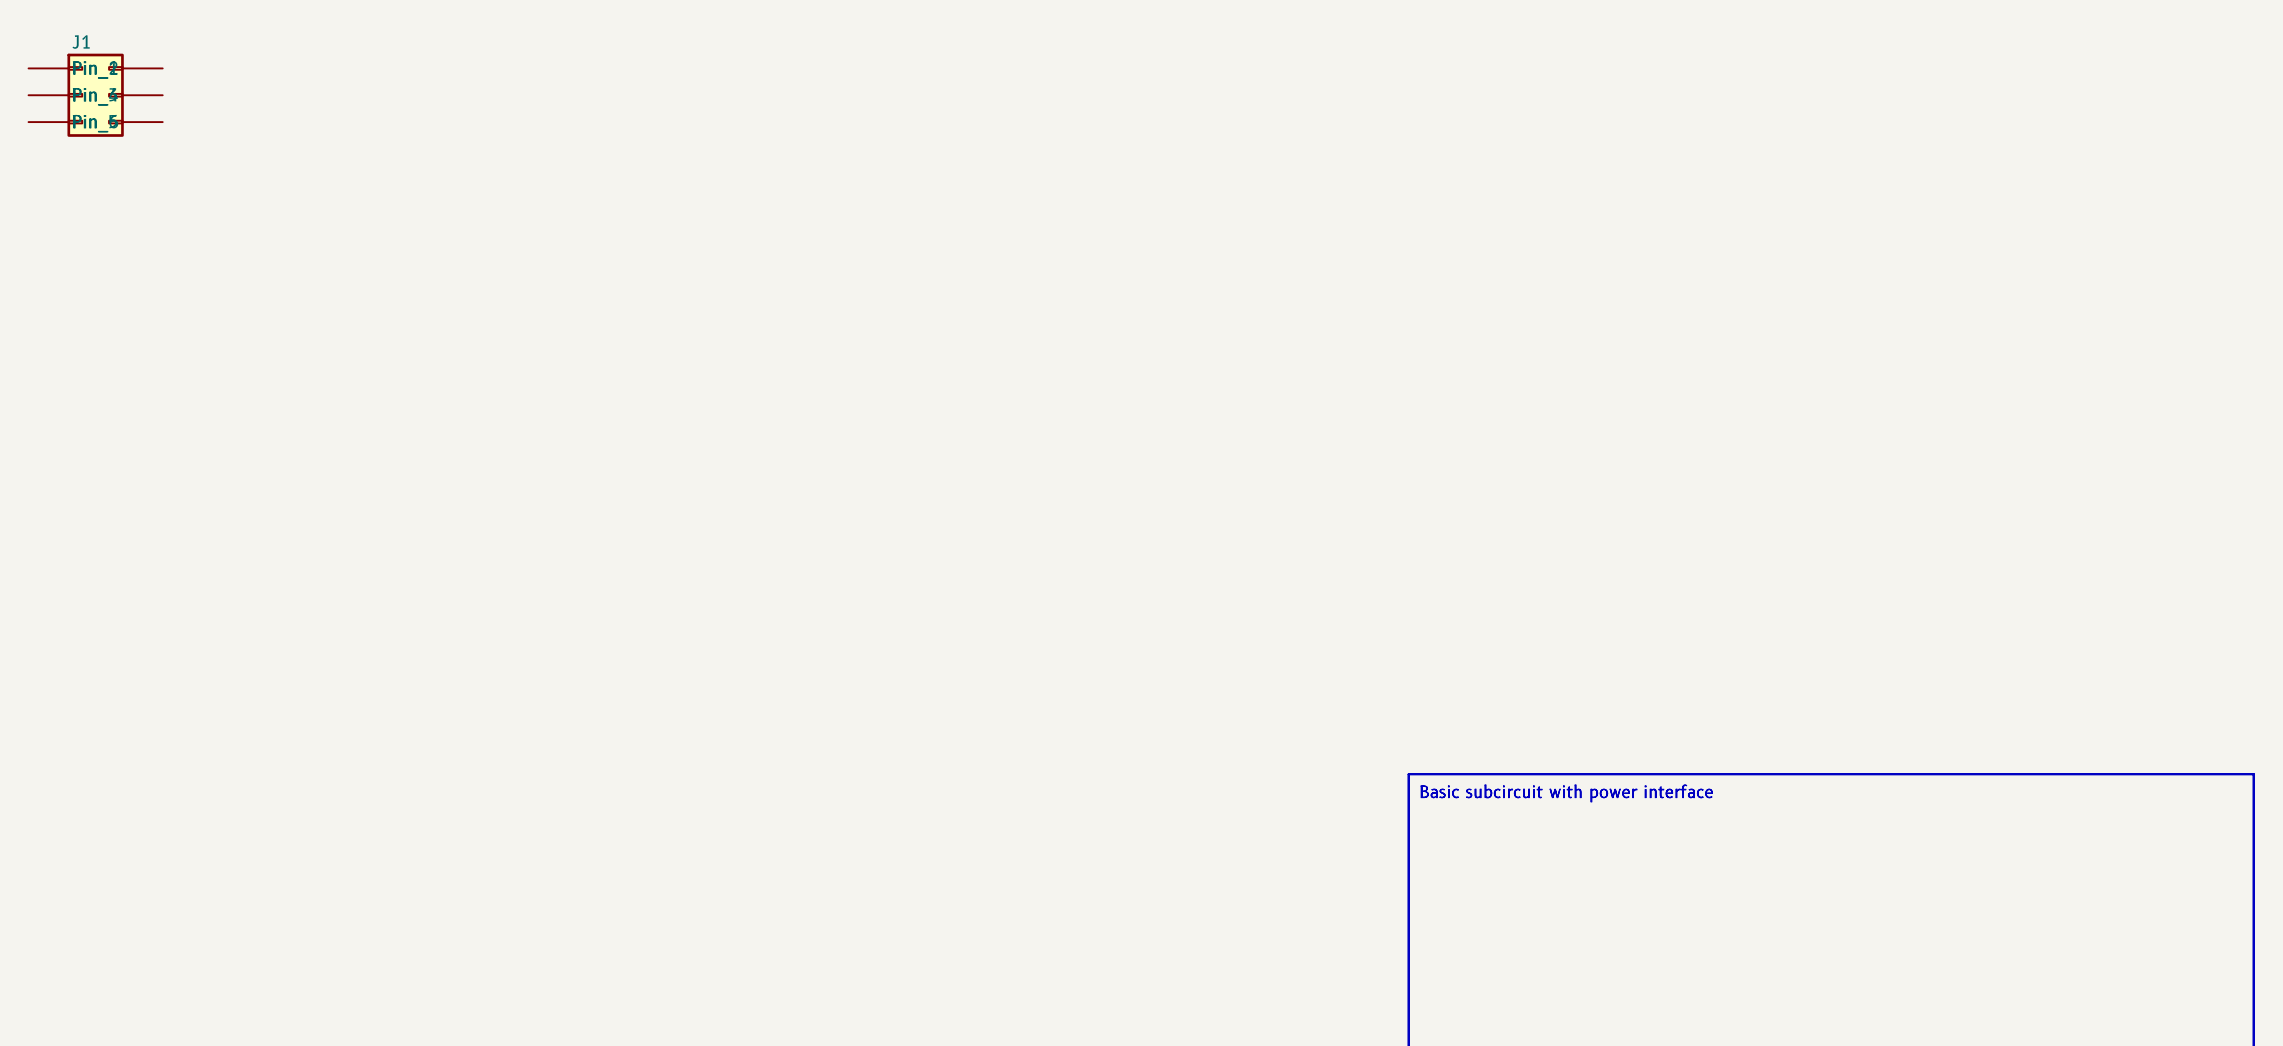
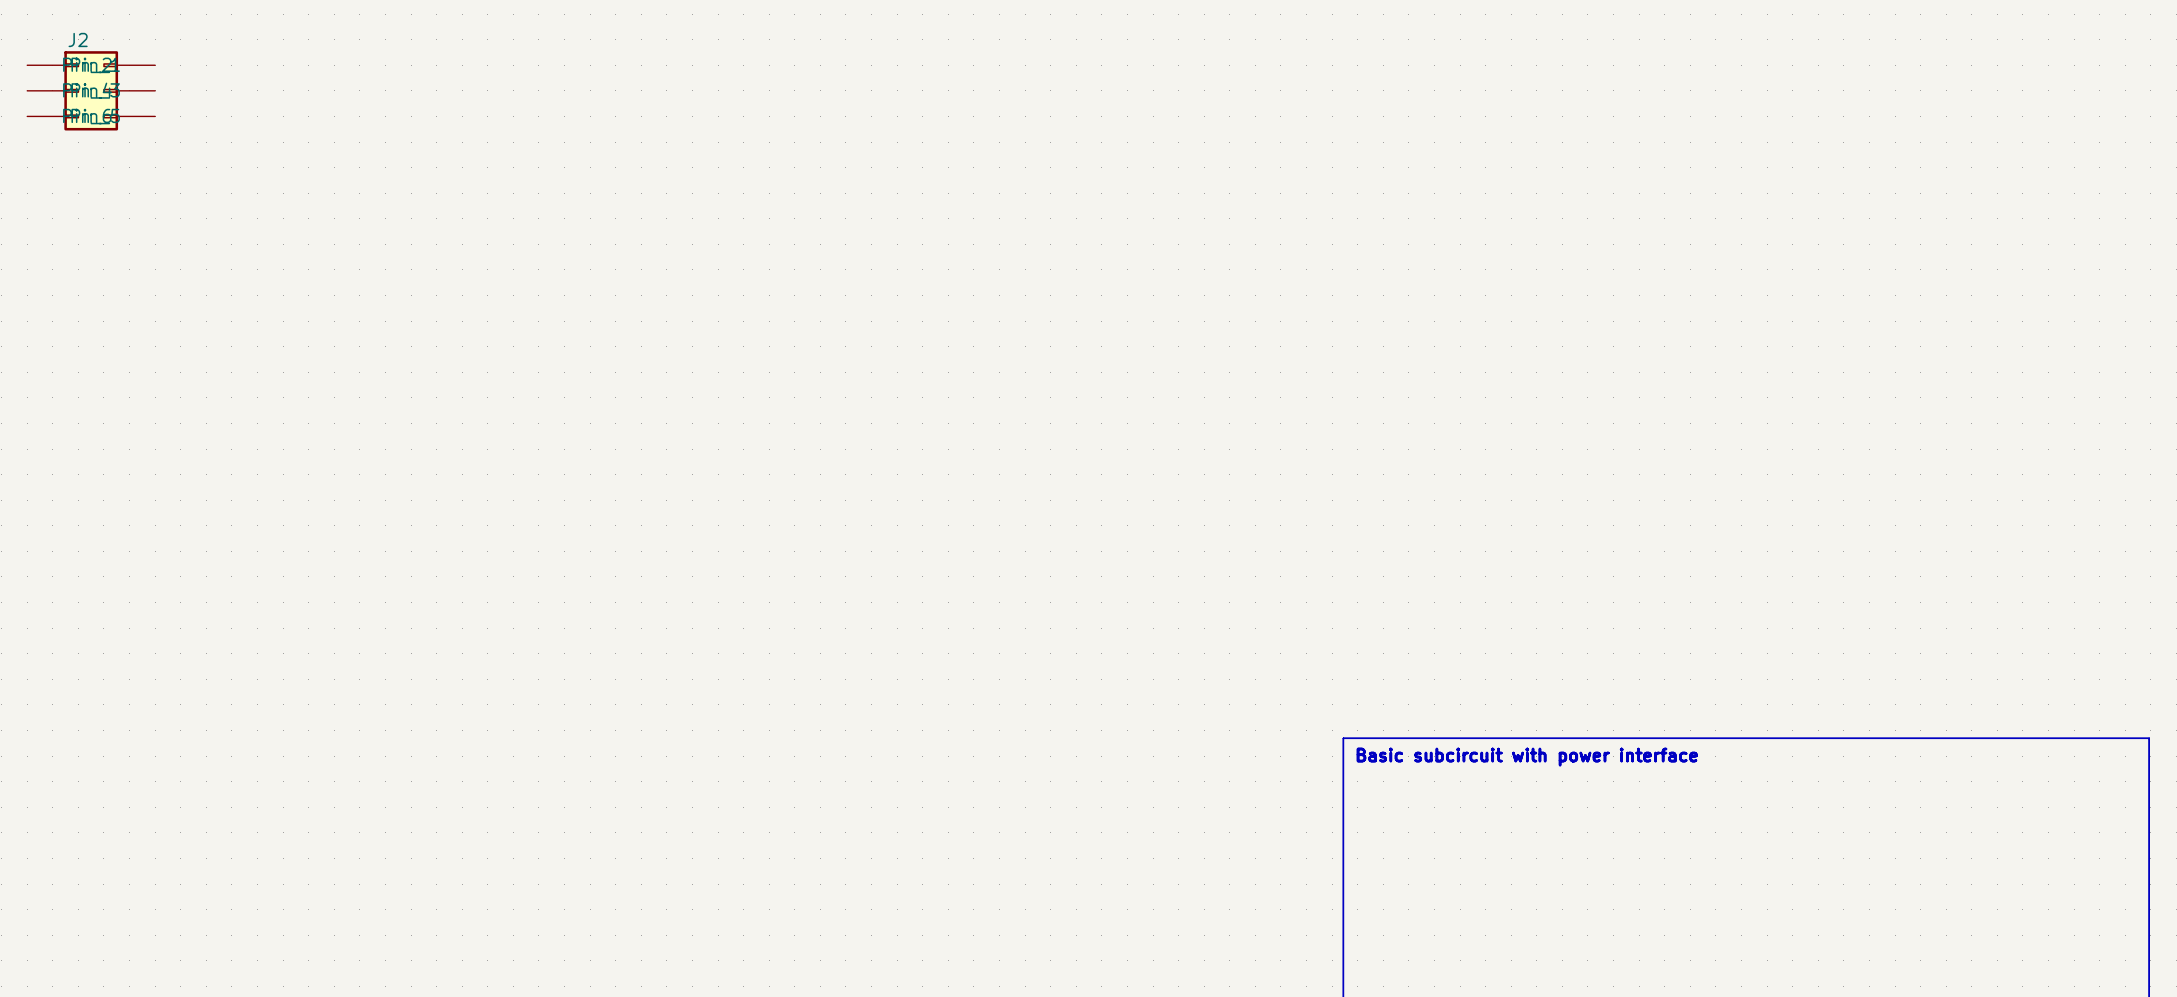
J1 name: J1 (81, 42) -> J2 (78, 39)

